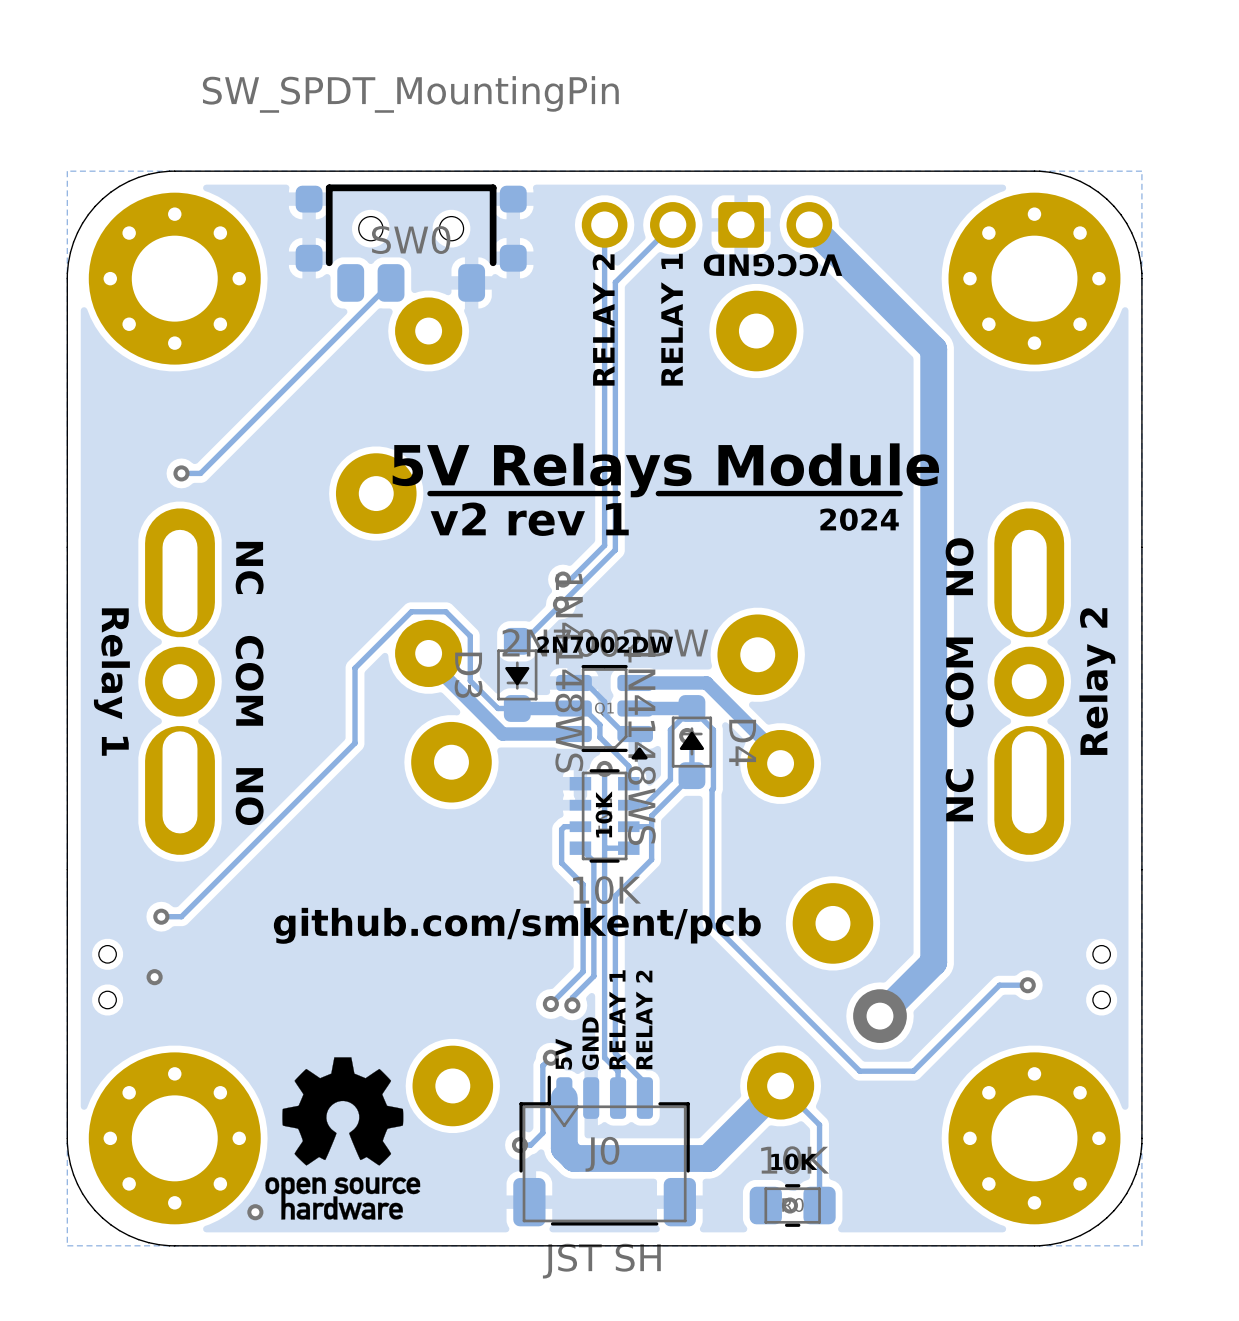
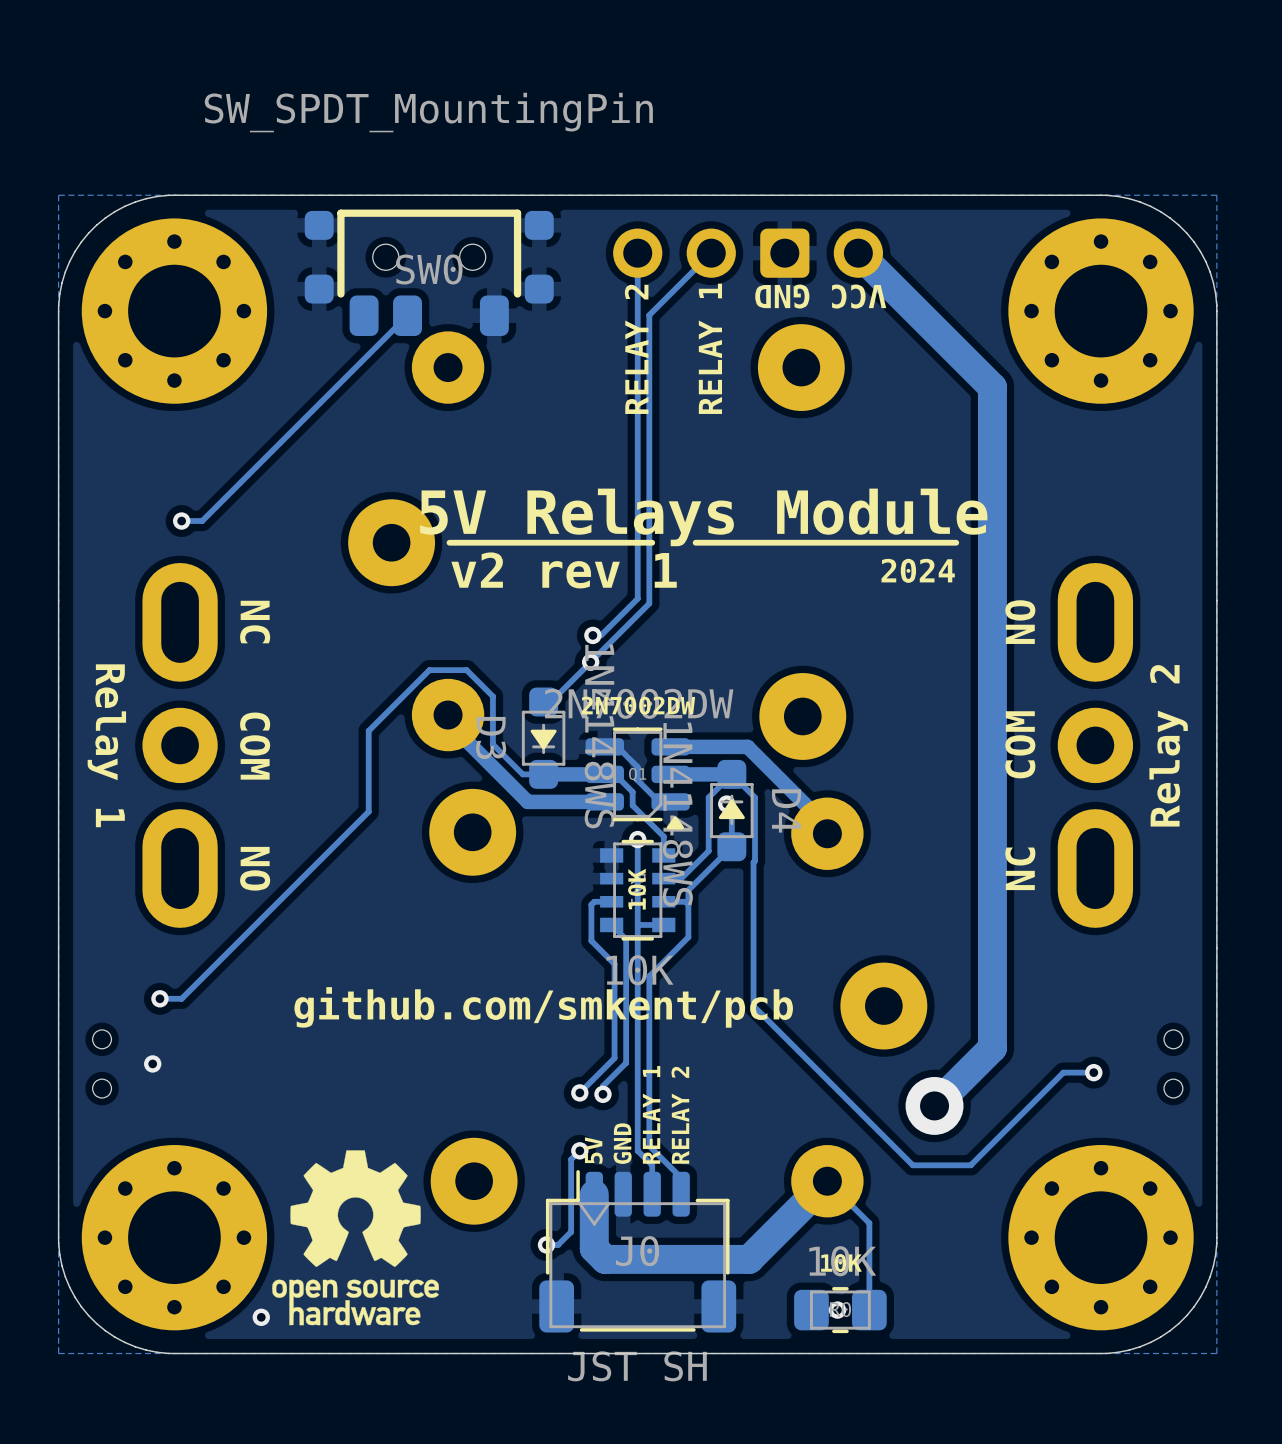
part footprint: [145, 508, 215, 855] -> [142, 563, 218, 928]
part footprint: [994, 508, 1065, 855] -> [1057, 563, 1134, 928]

